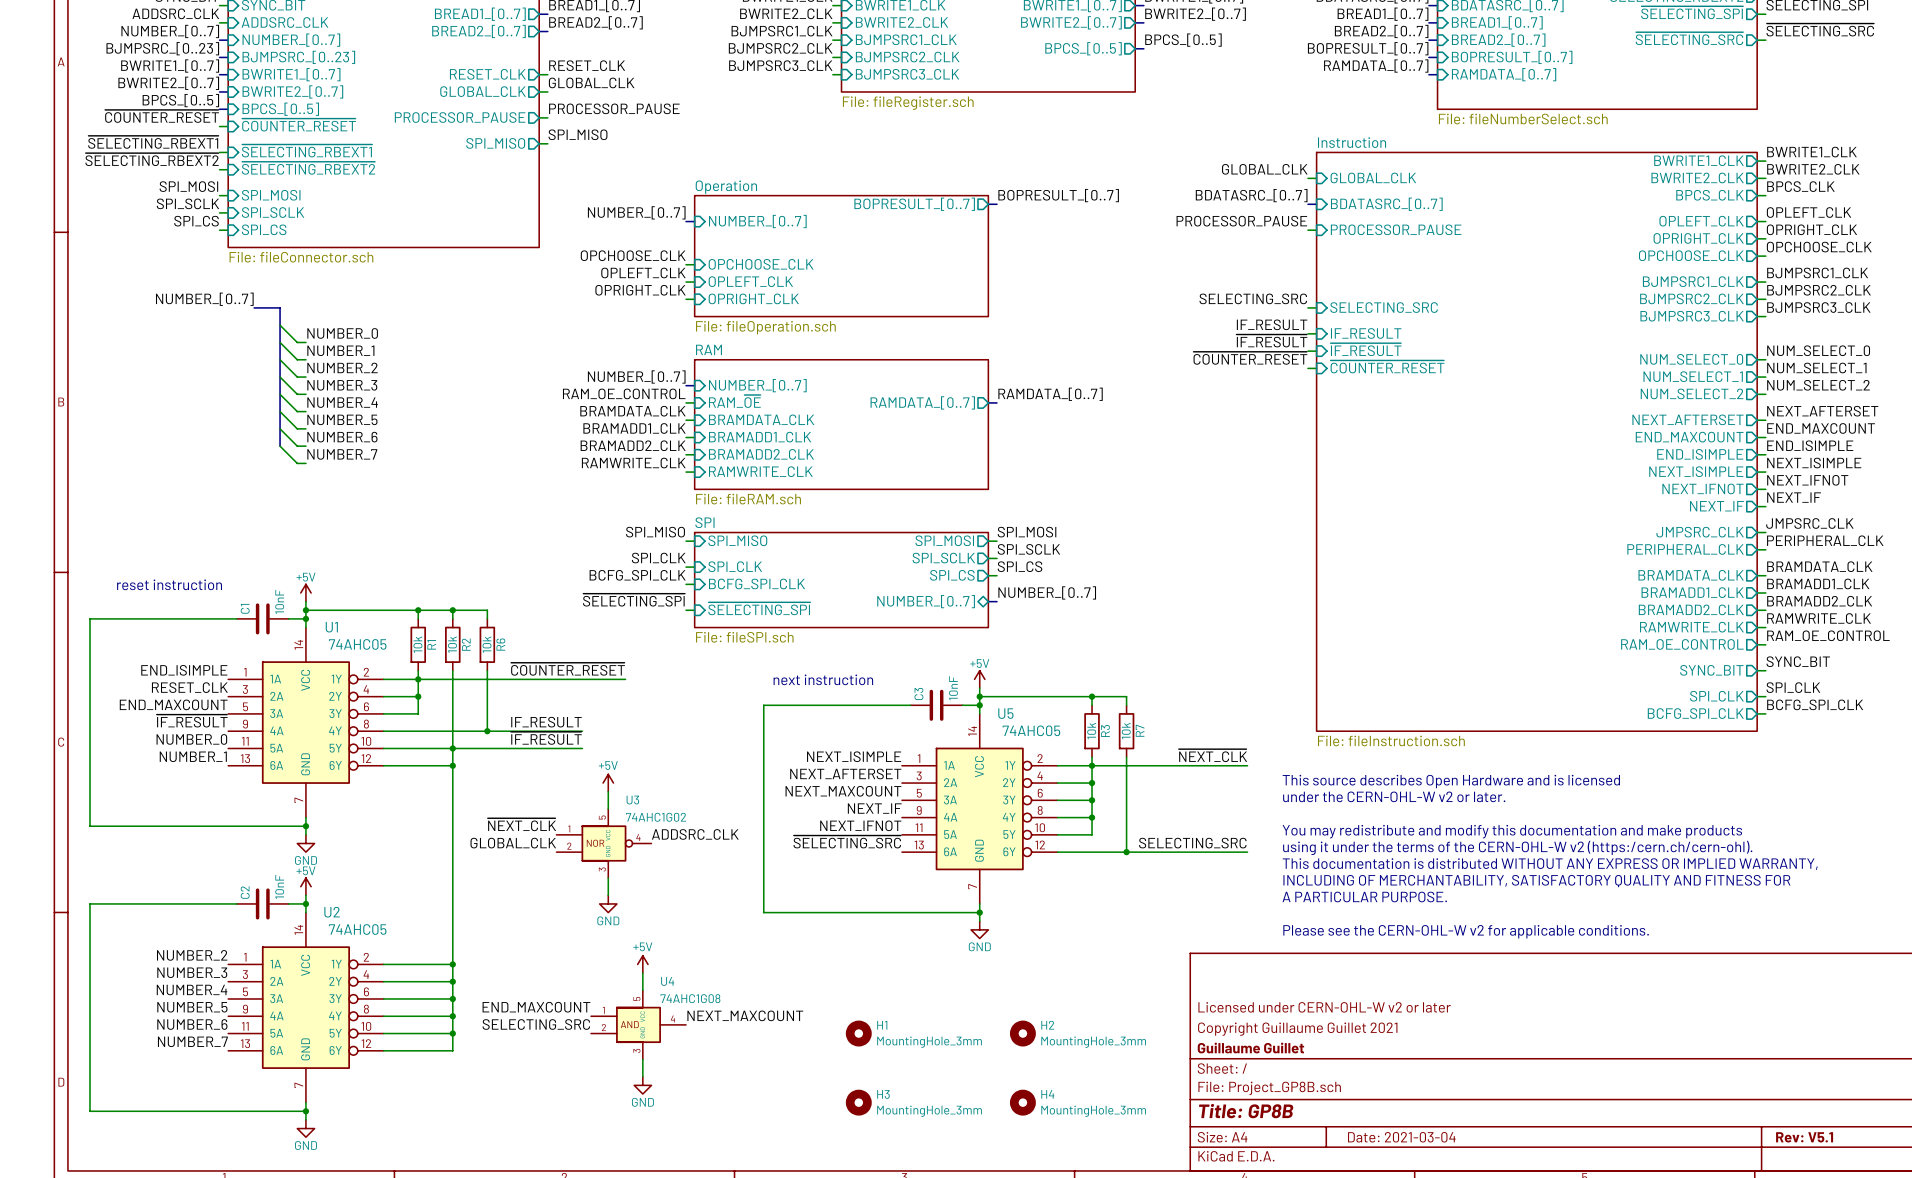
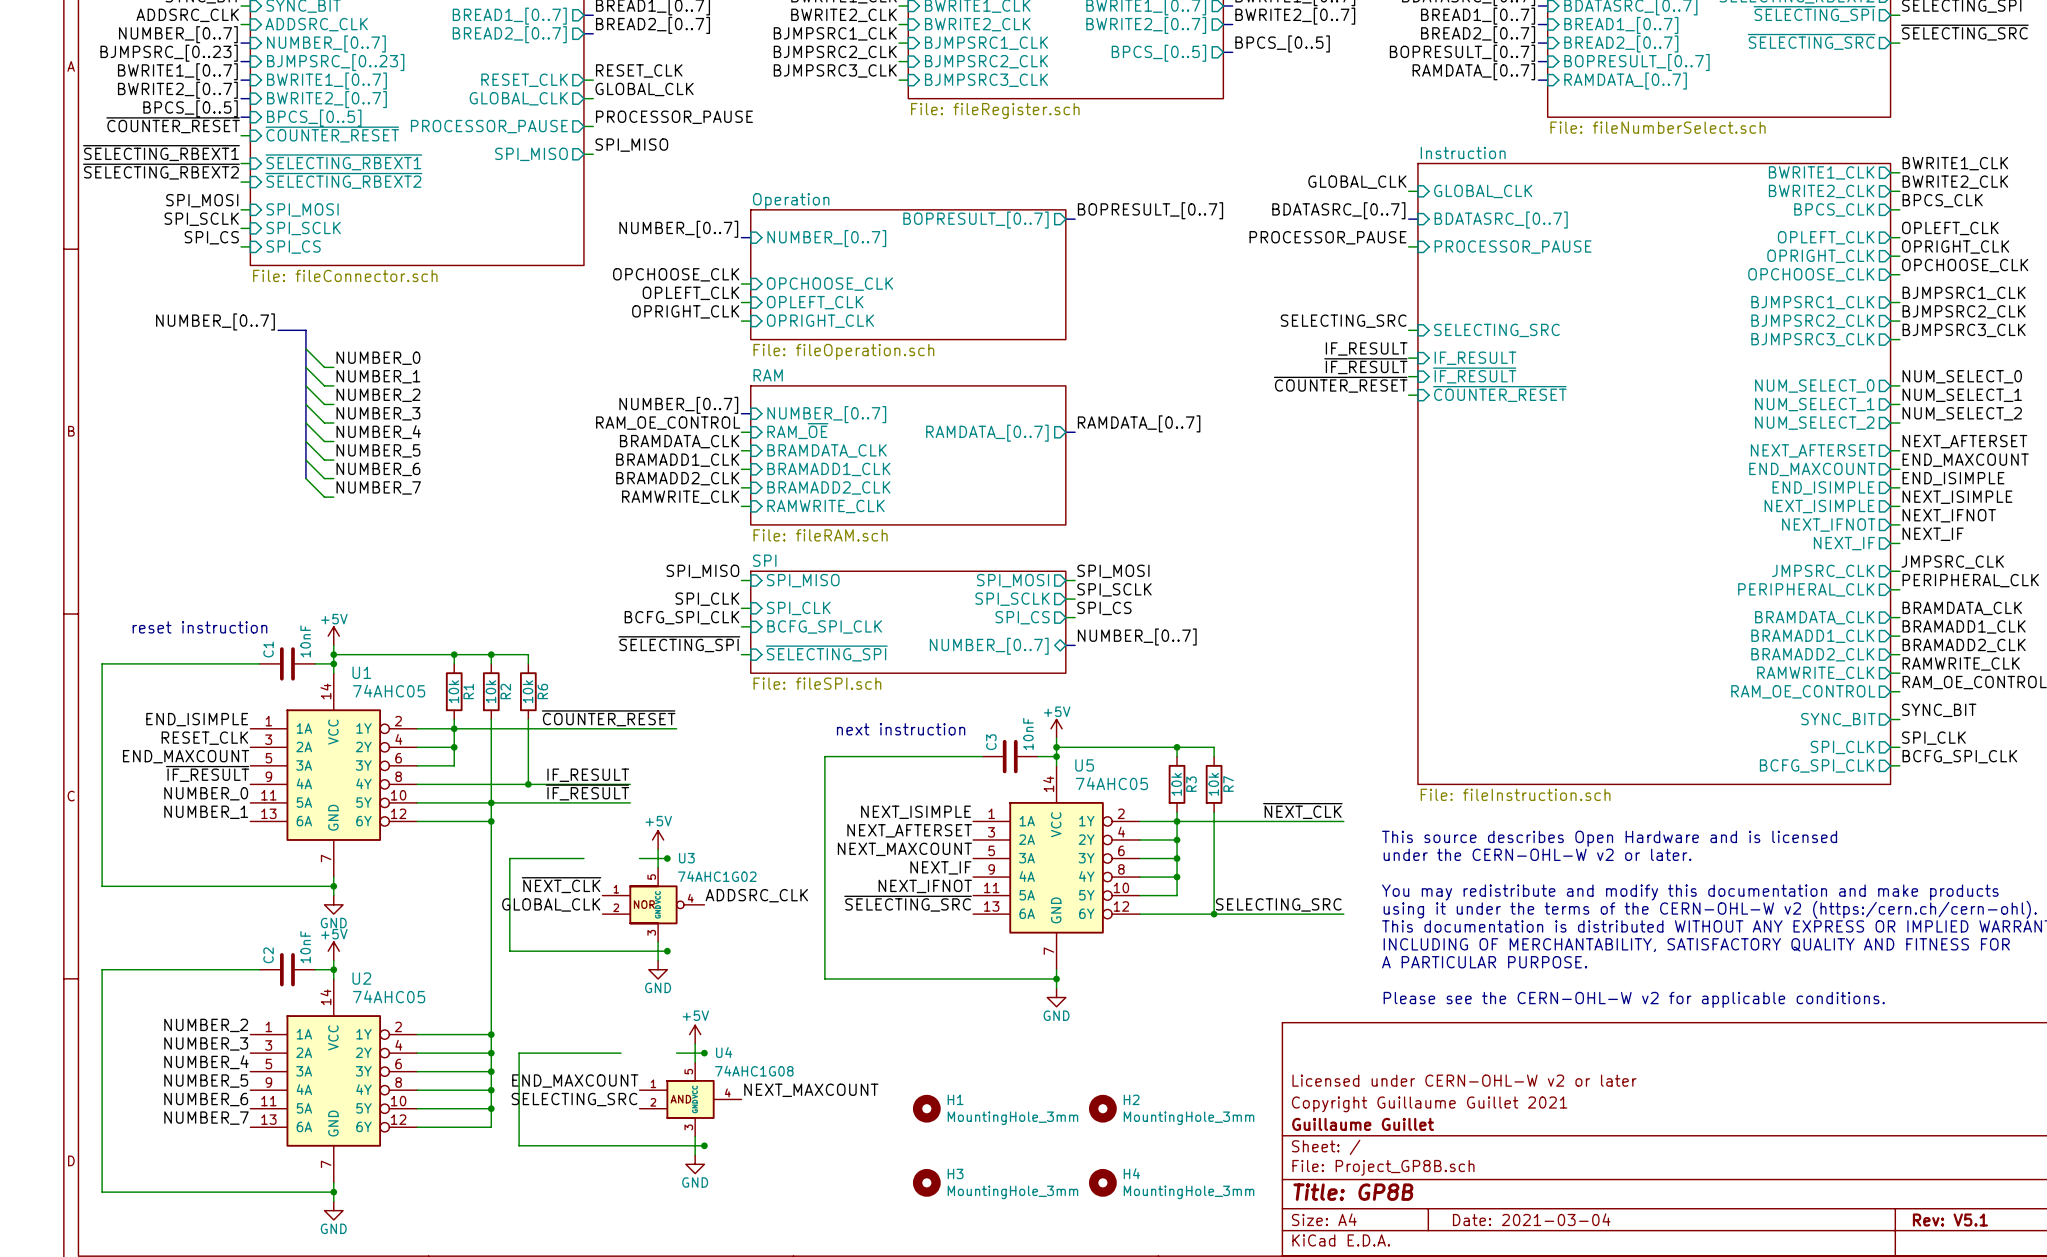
wire: none -> (583, 858) (509, 858) (509, 951) (667, 951)
wire: none -> (639, 858) (667, 858)
junction: none -> (667, 858)
junction: none -> (667, 951)
wire: none -> (621, 1053) (519, 1053) (519, 1145) (704, 1145)
wire: none -> (676, 1053) (704, 1053)
junction: none -> (704, 1053)
junction: none -> (704, 1145)

